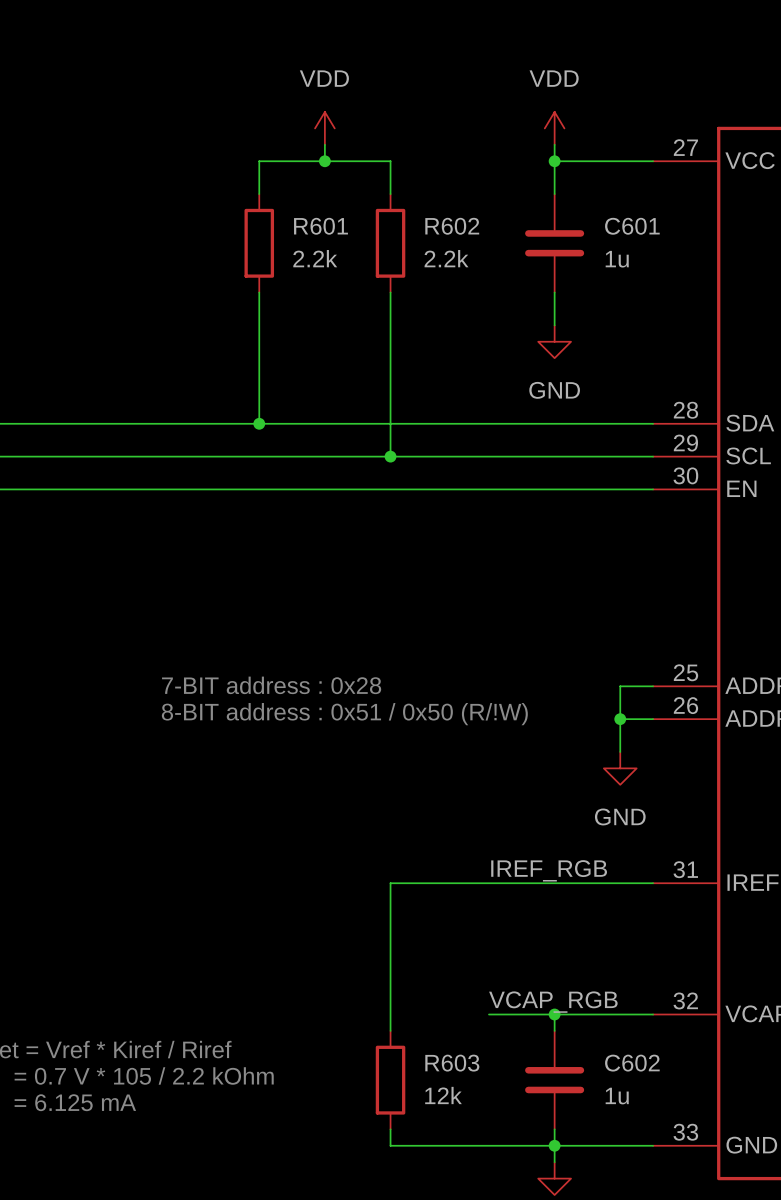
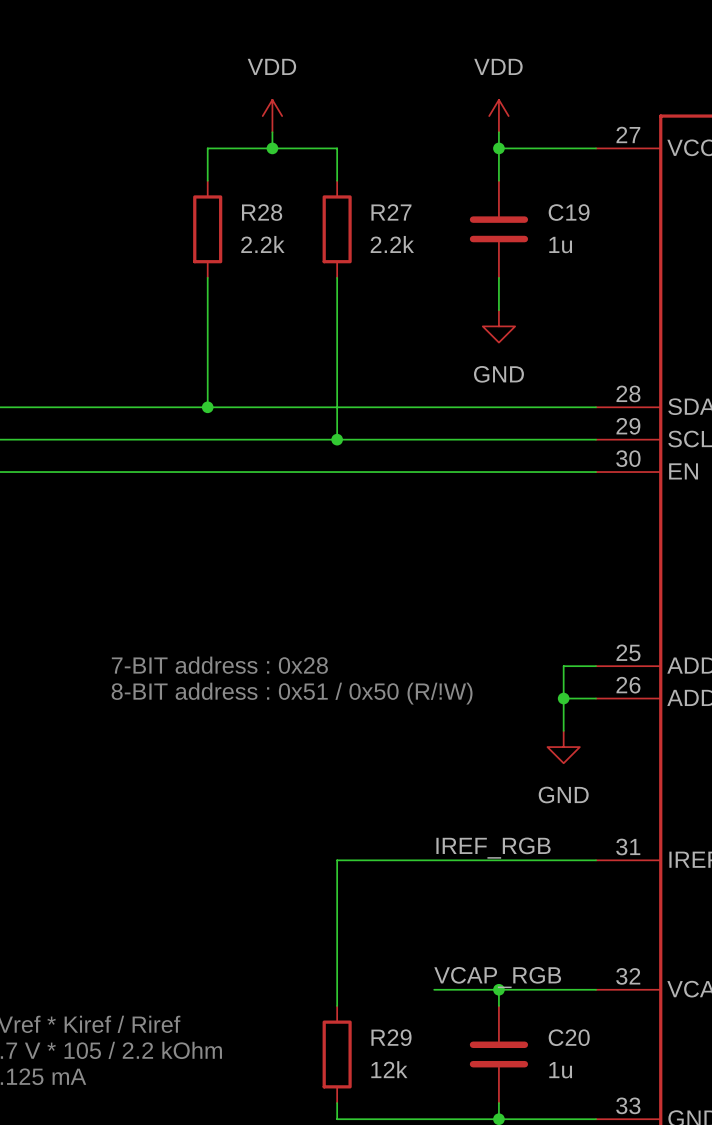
R601 name: R601 (320, 226) -> R28 (262, 212)
R602 name: R602 (452, 226) -> R27 (391, 212)
C601 name: C601 (632, 226) -> C19 (569, 212)
R603 name: R603 (452, 1063) -> R29 (391, 1037)
C602 name: C602 (632, 1063) -> C20 (569, 1037)

